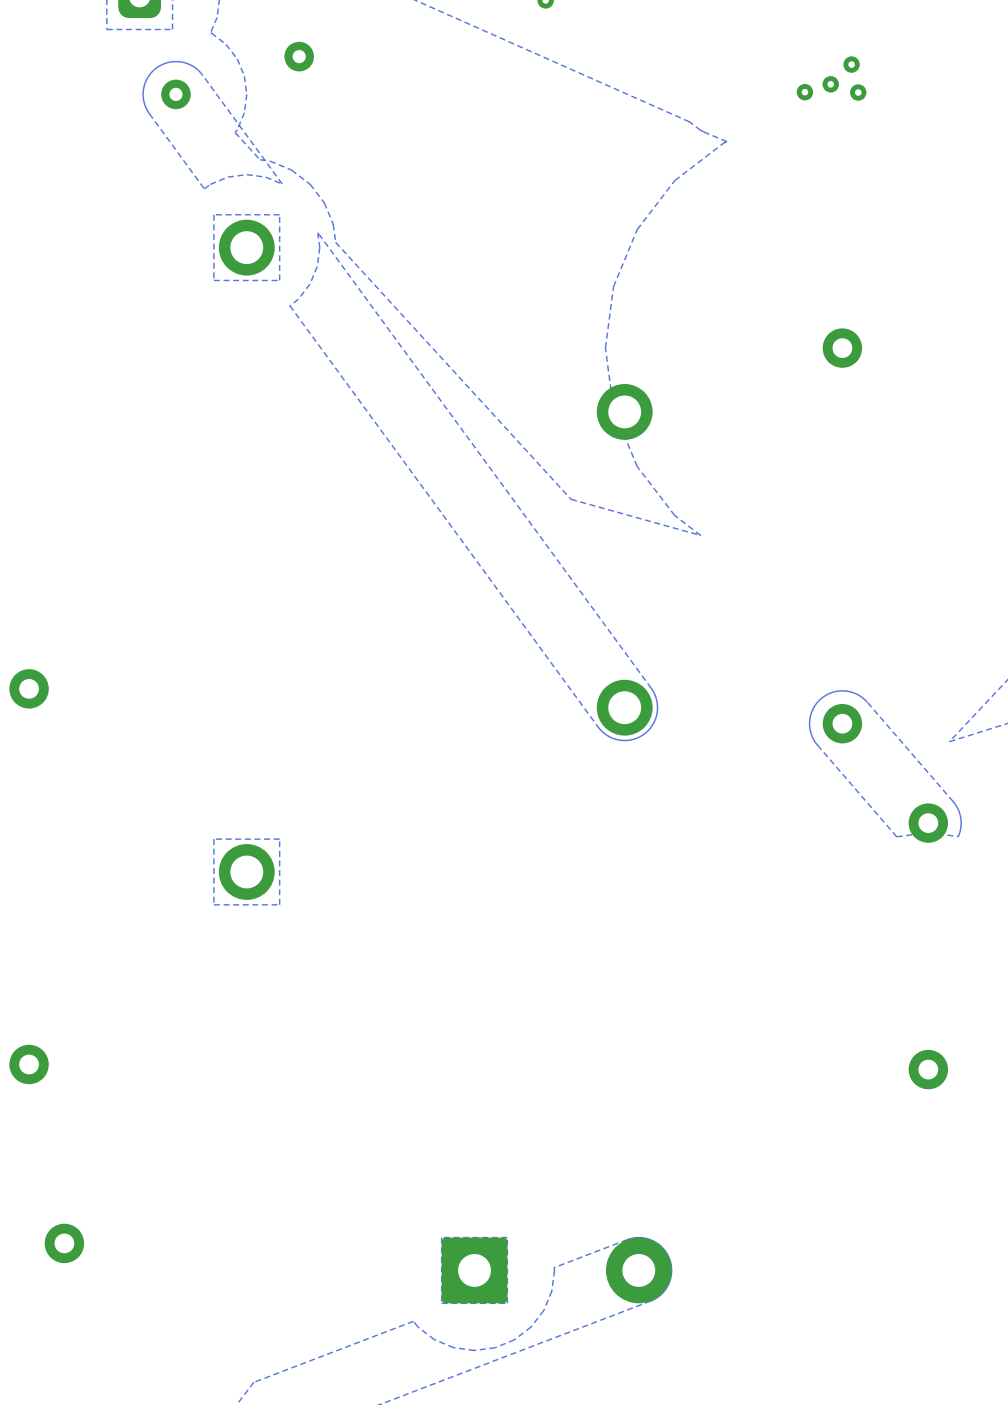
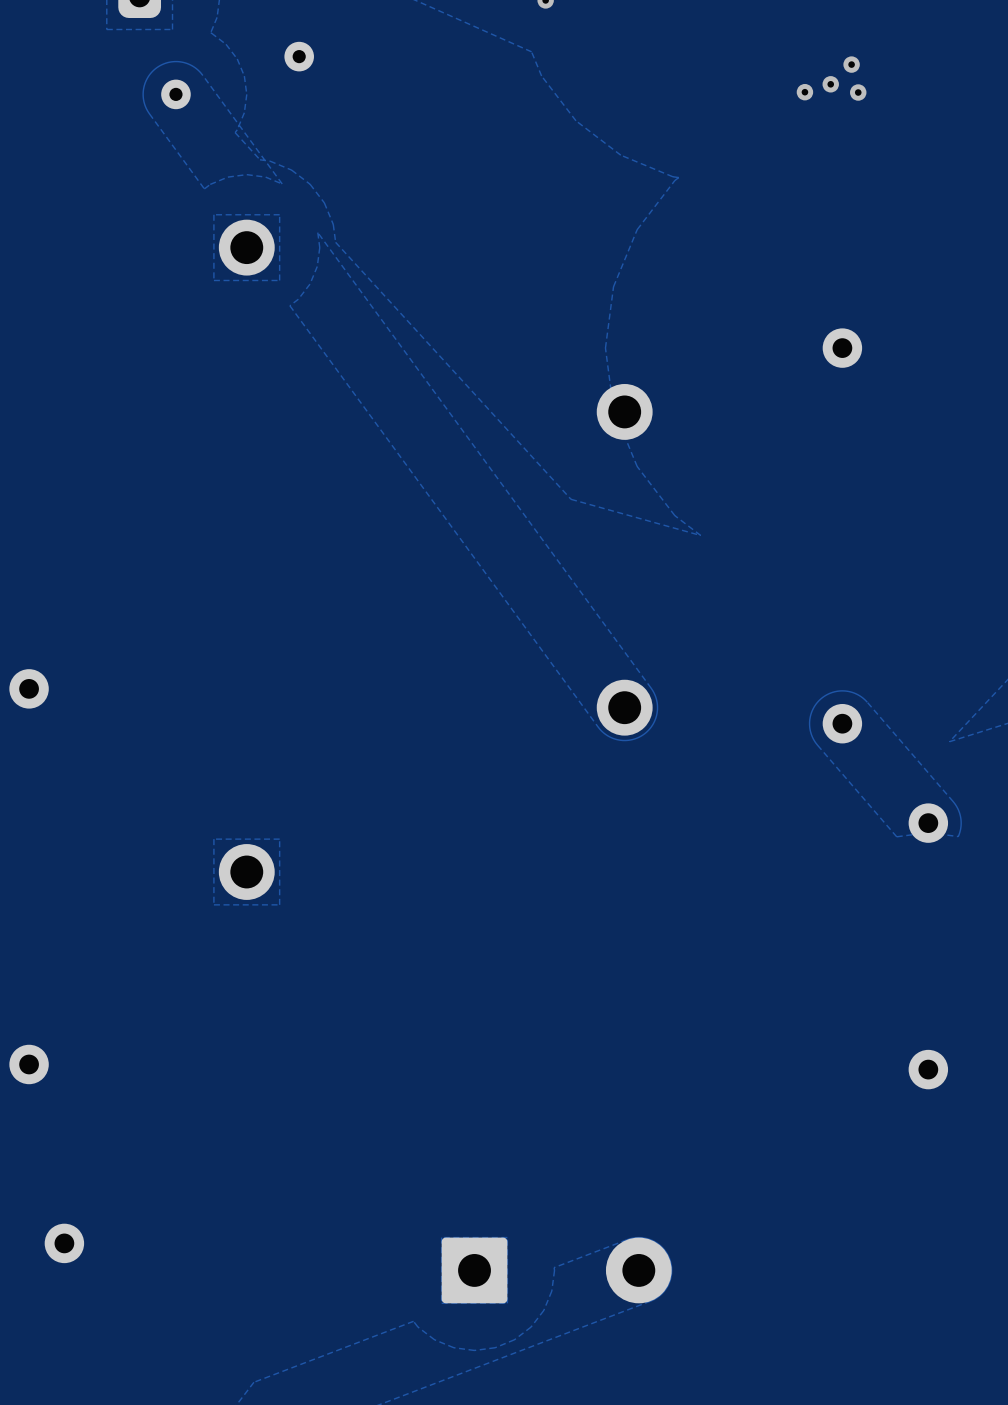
zone outline: (531, 51) (689, 121) (700, 130) (727, 141) (674, 180) -> (531, 51) (541, 76) (575, 120) (620, 155) (678, 177) (674, 180)

